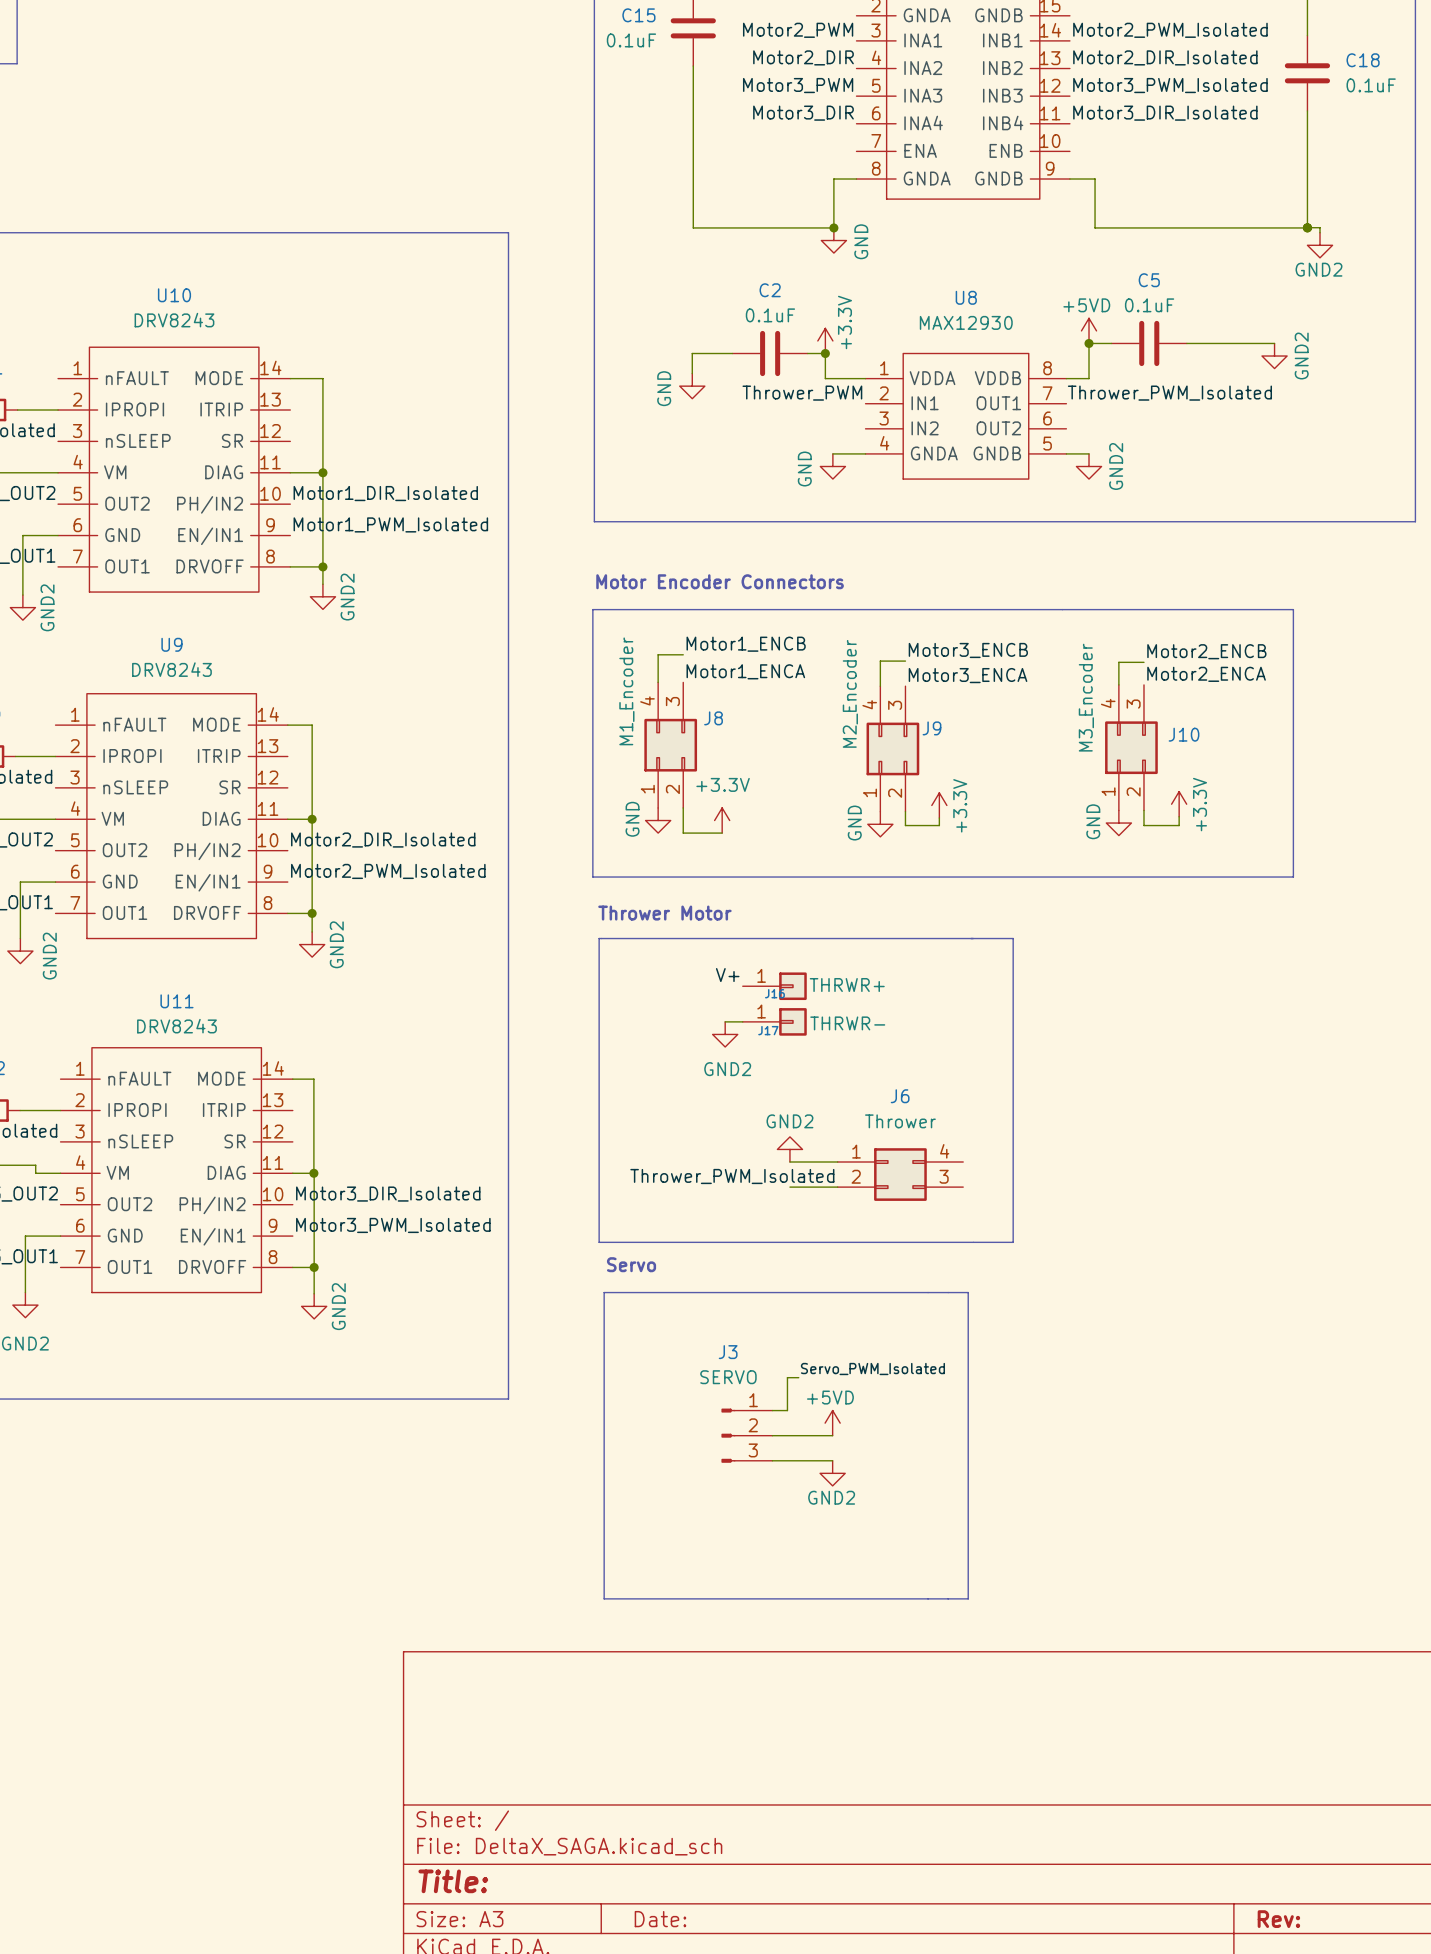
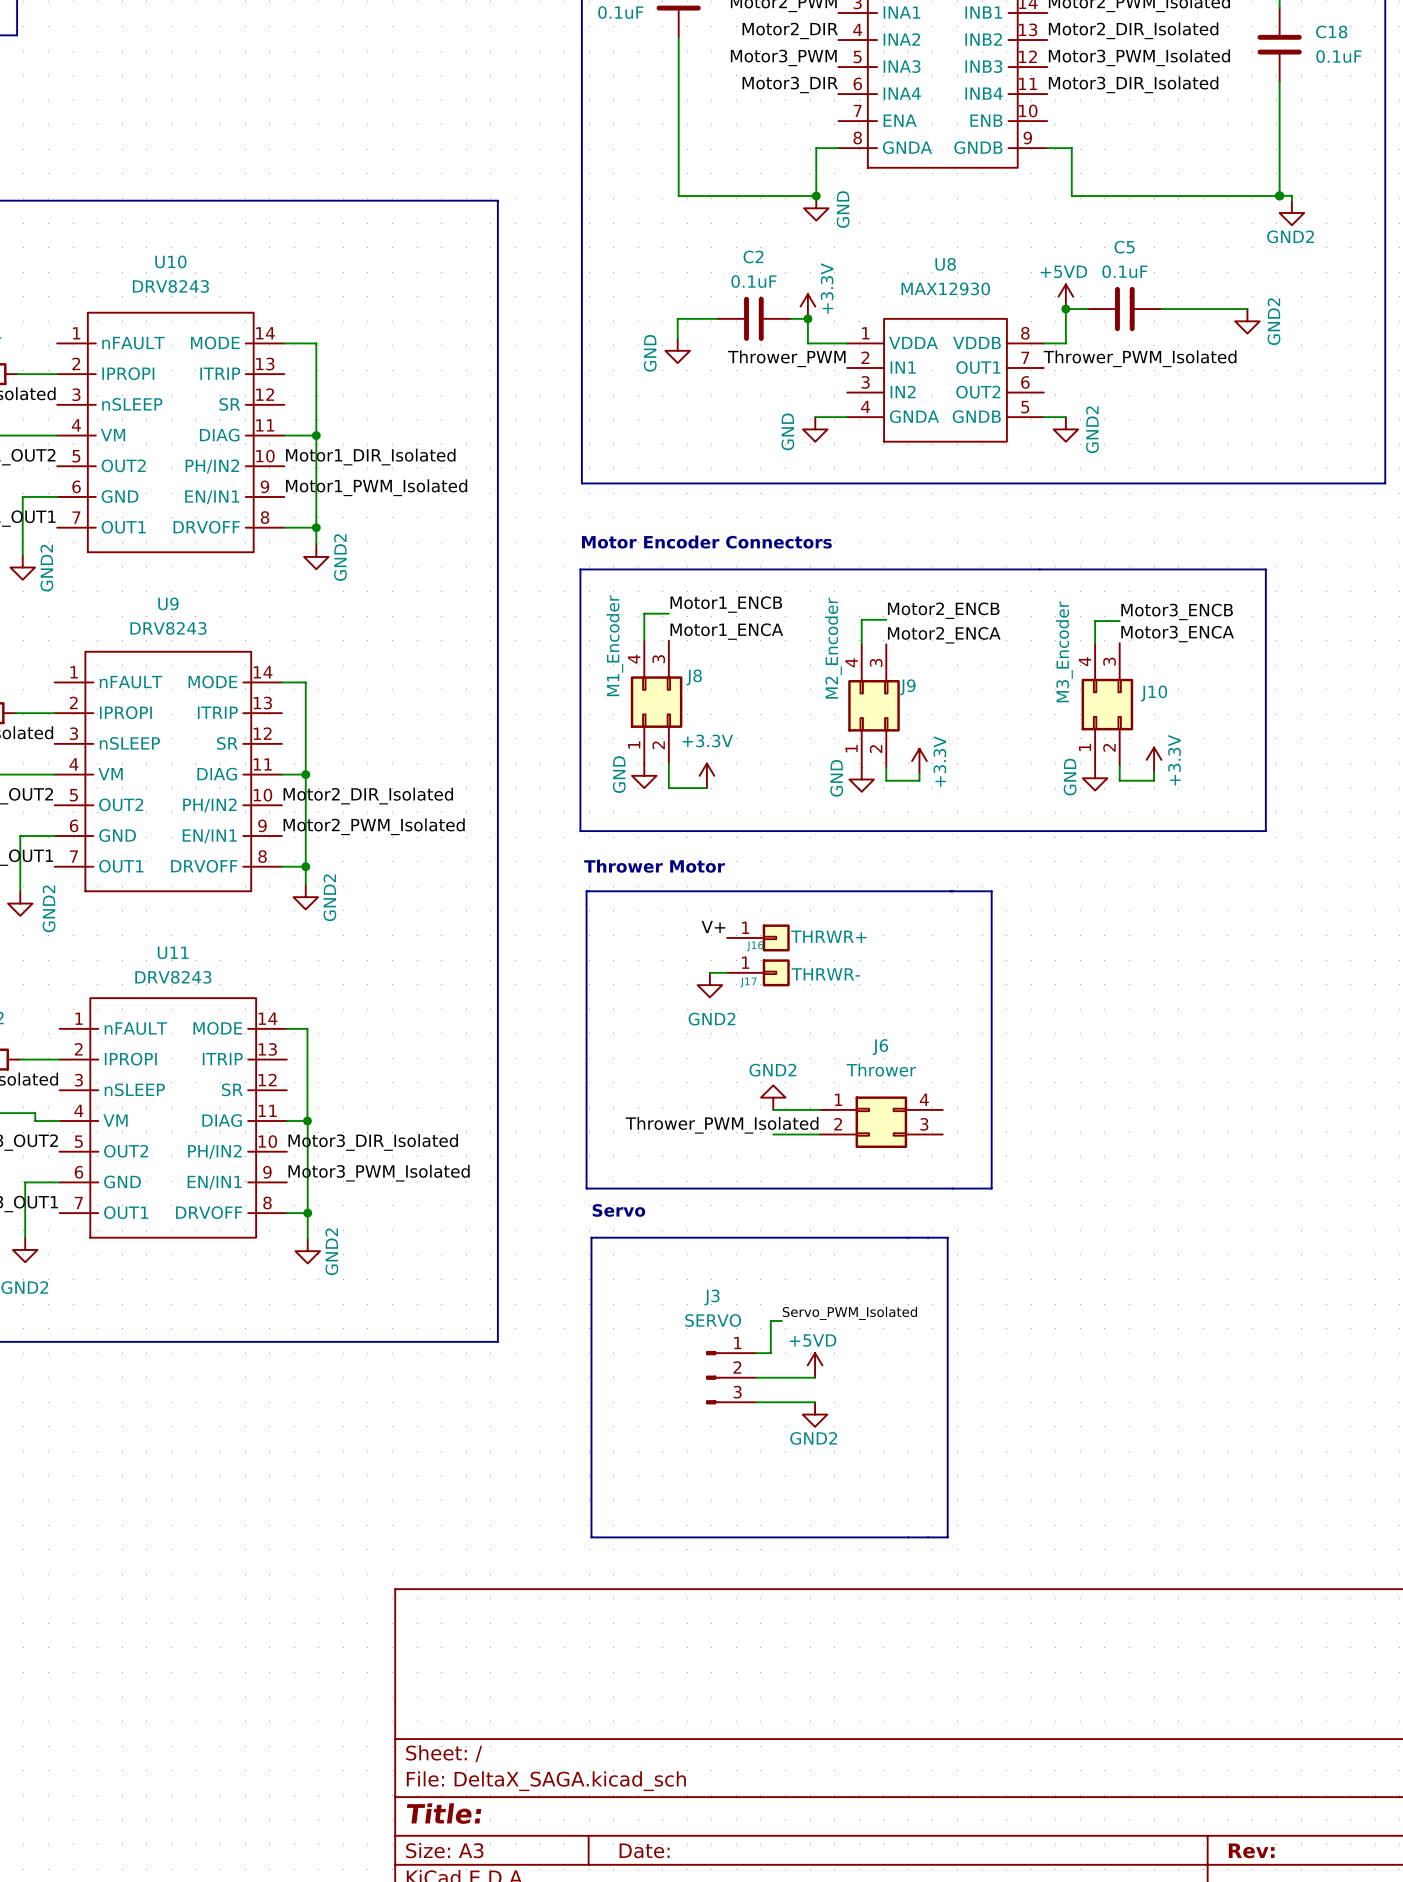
label: Motor3_ENCB (968, 650) -> Motor2_ENCB (943, 610)
label: Motor2_ENCB (1206, 651) -> Motor3_ENCB (1177, 611)
label: Motor2_ENCA (1206, 674) -> Motor3_ENCA (1177, 634)
label: Motor3_ENCA (968, 675) -> Motor2_ENCA (944, 635)

